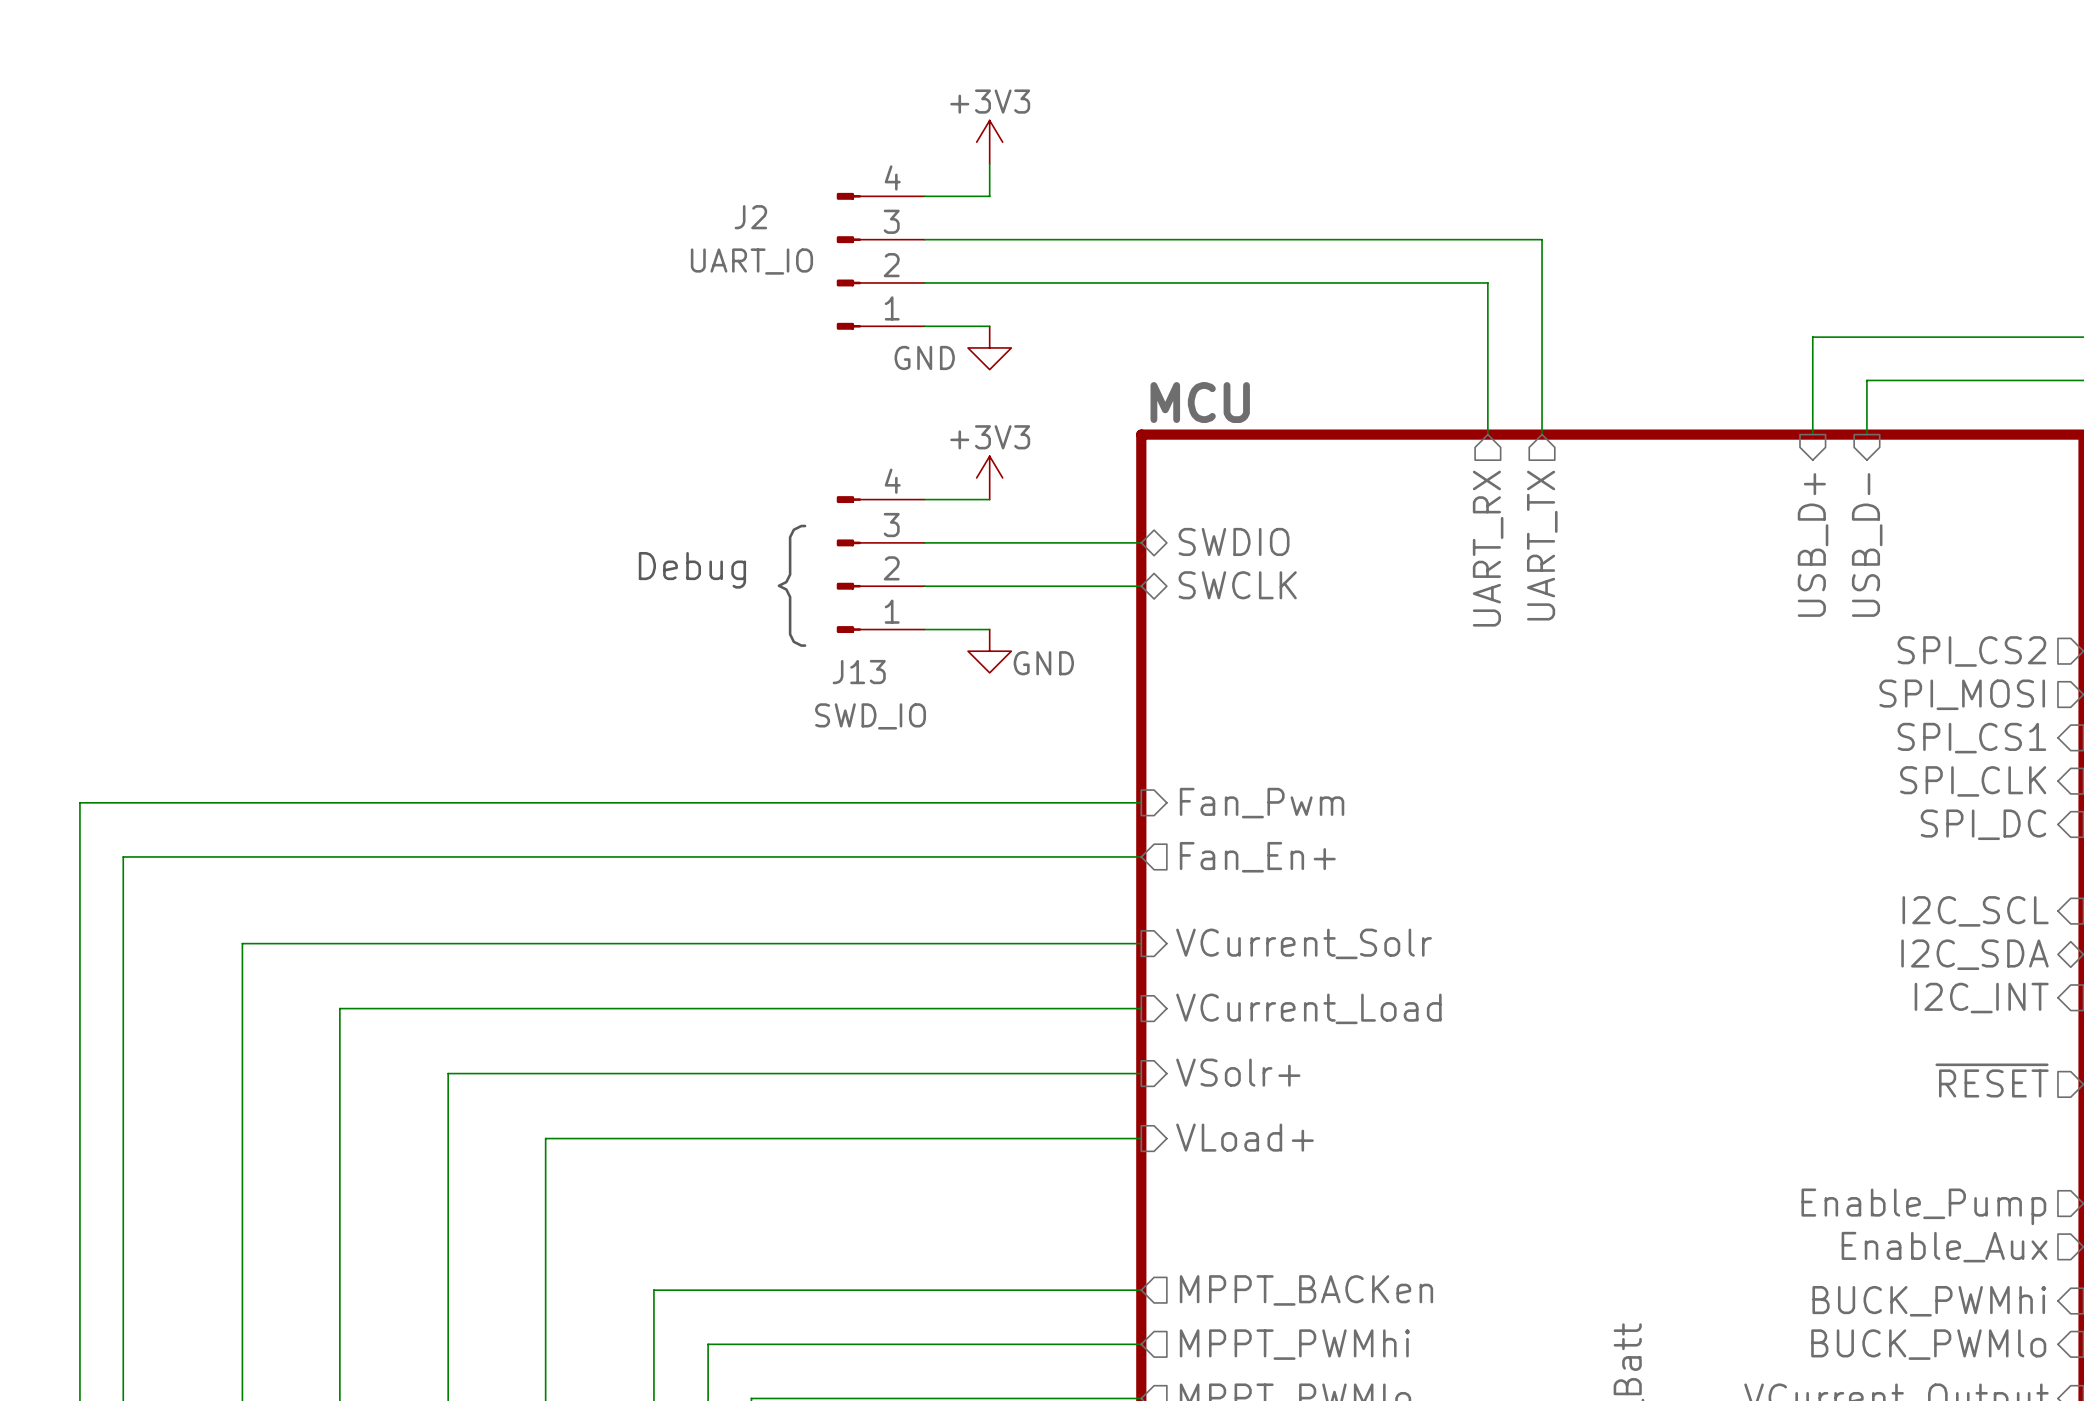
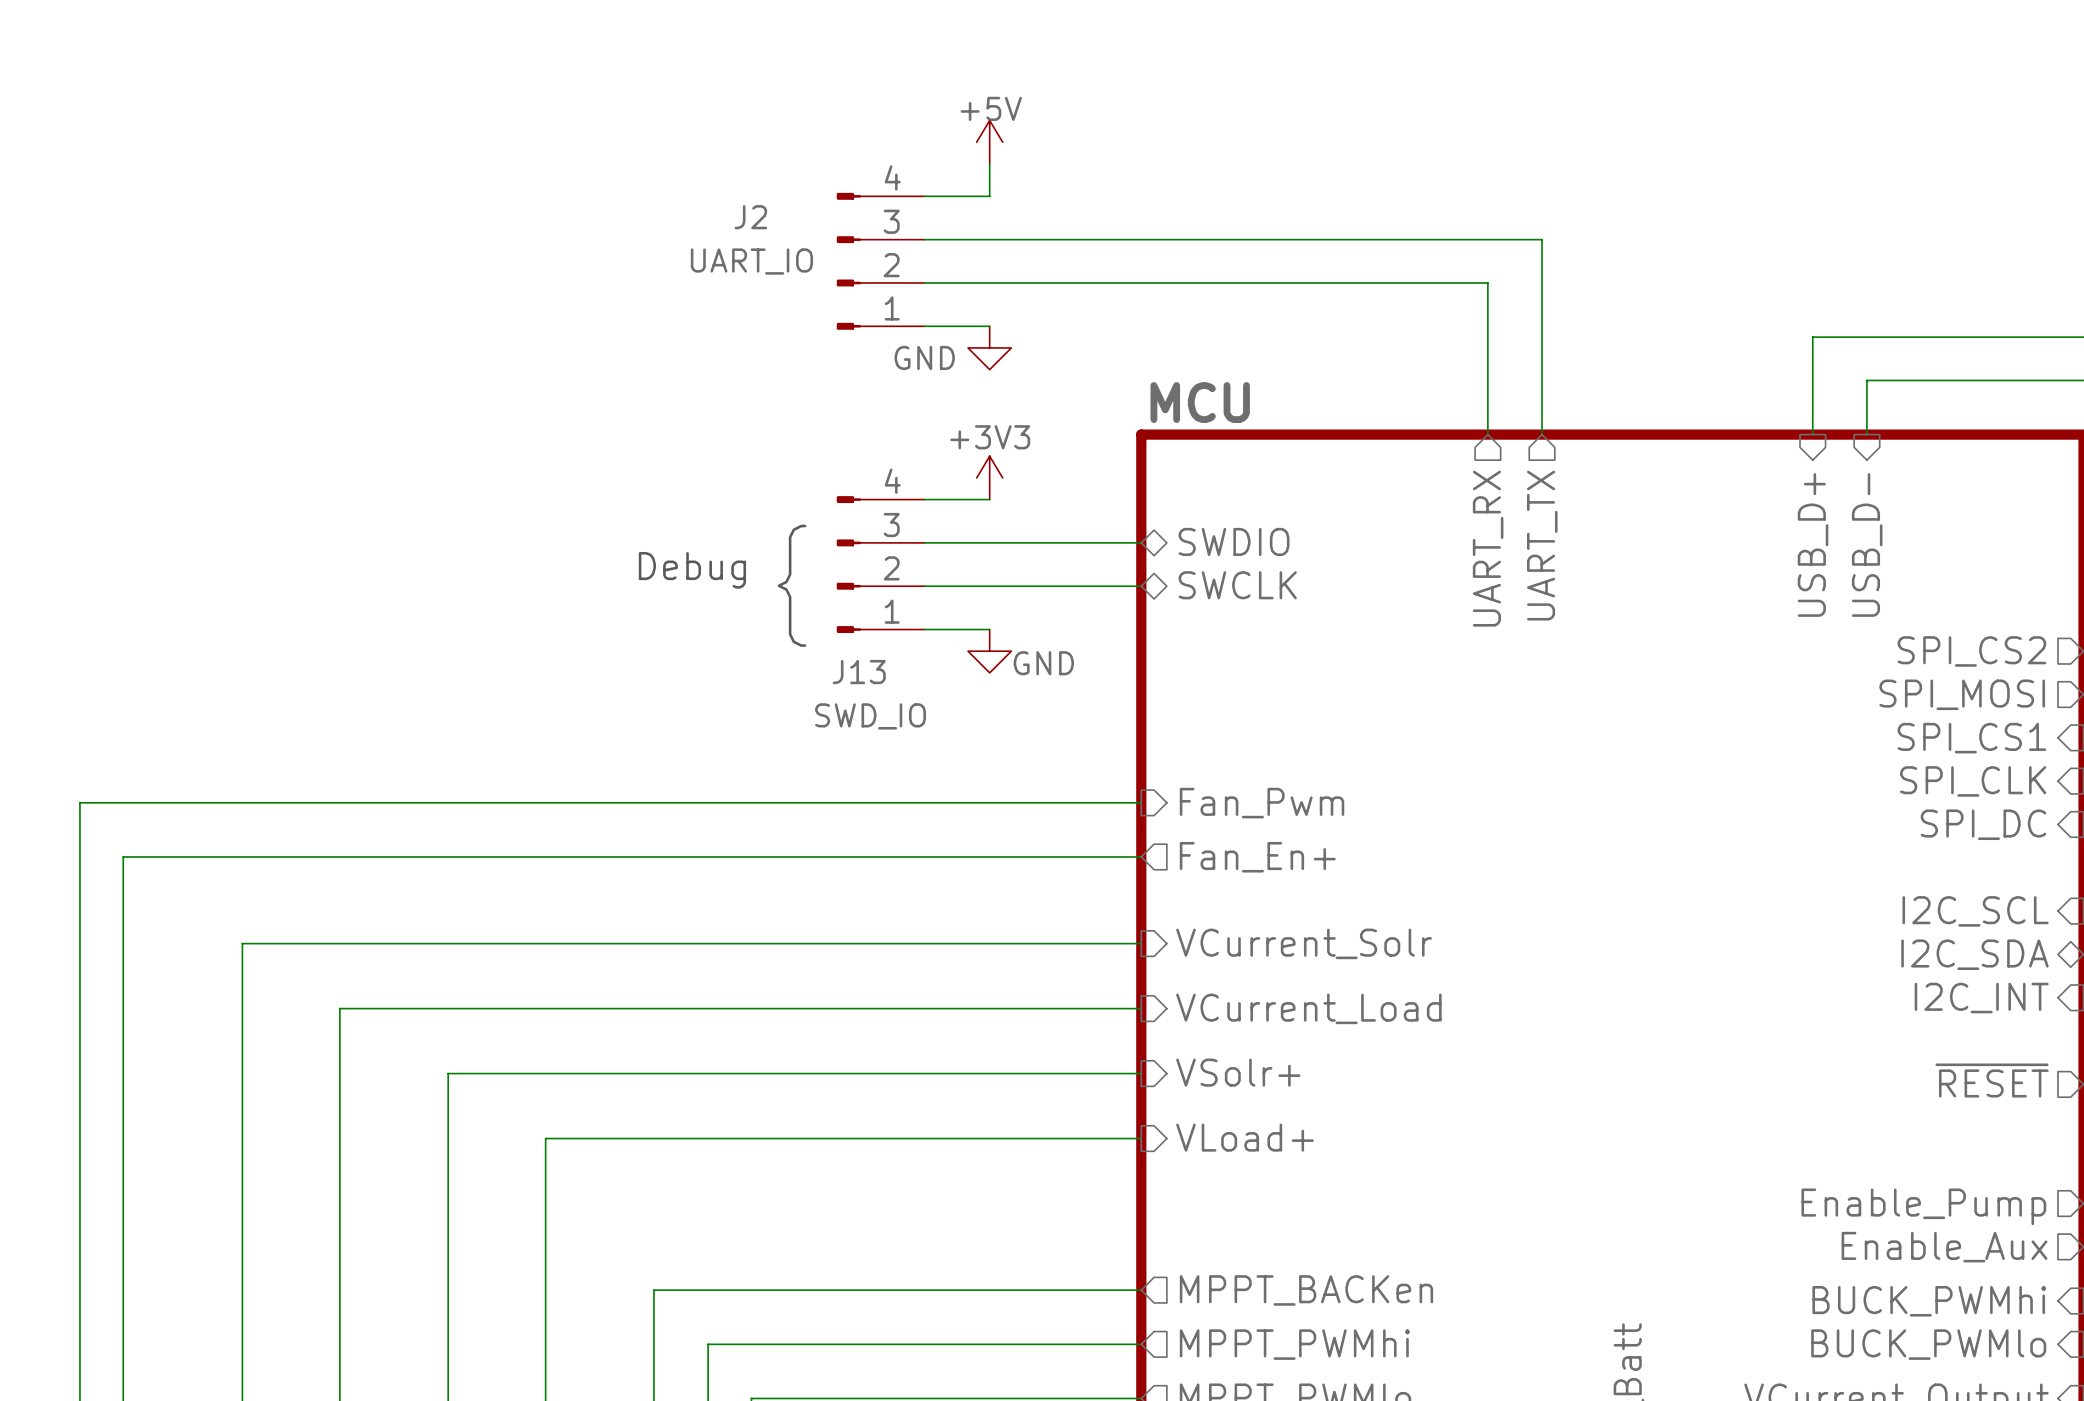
power symbol: +3V3 (989, 142) -> +5V (989, 142)

